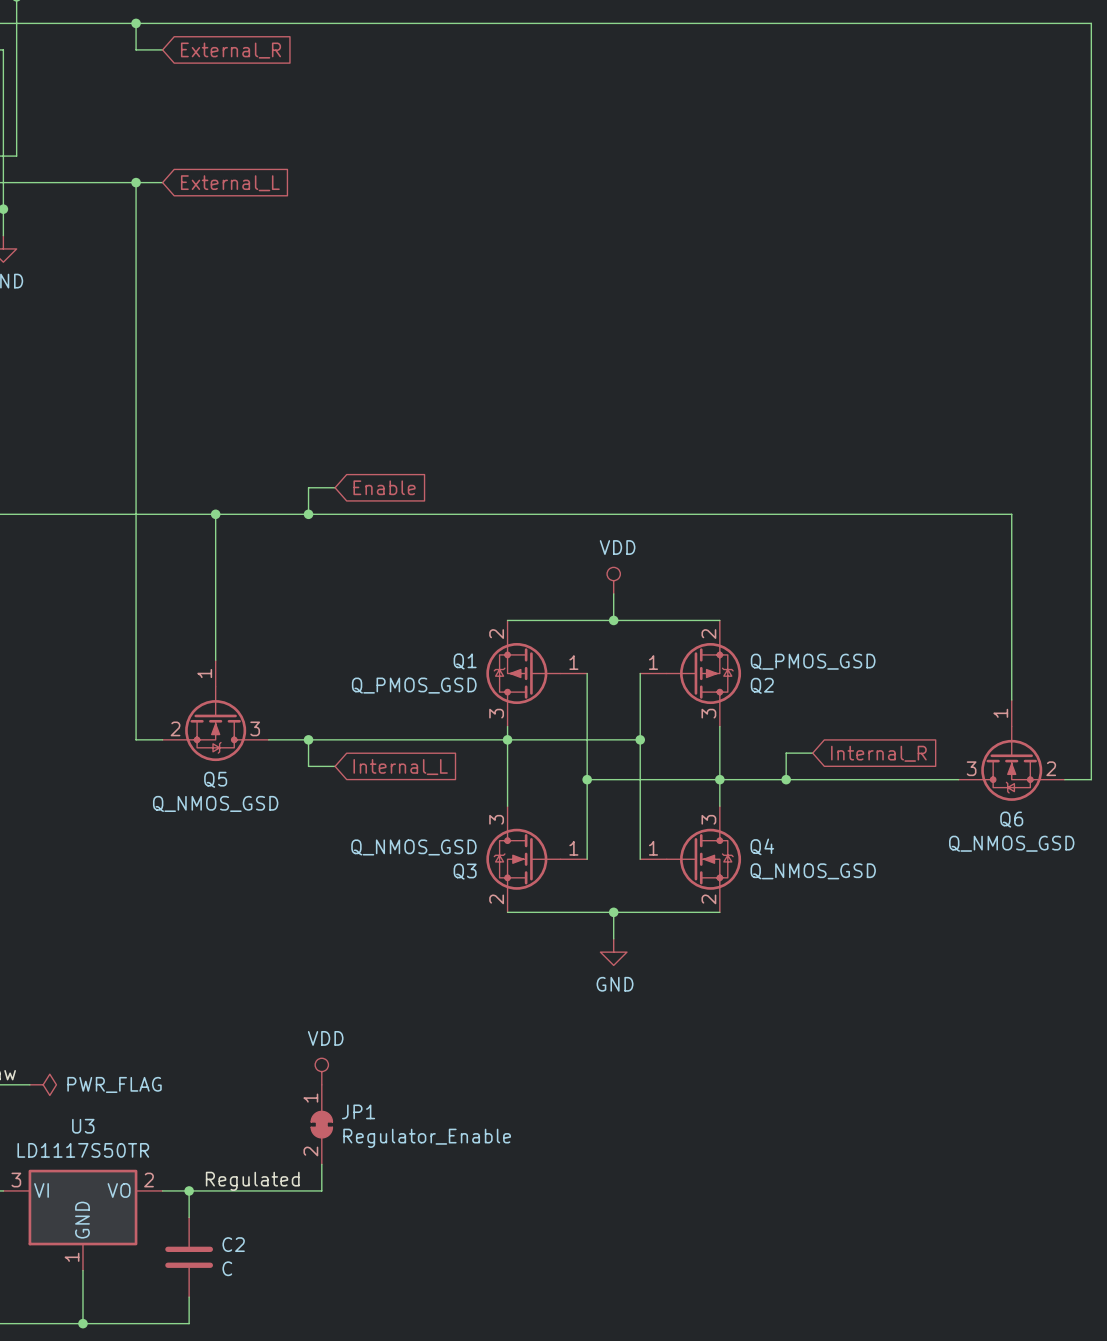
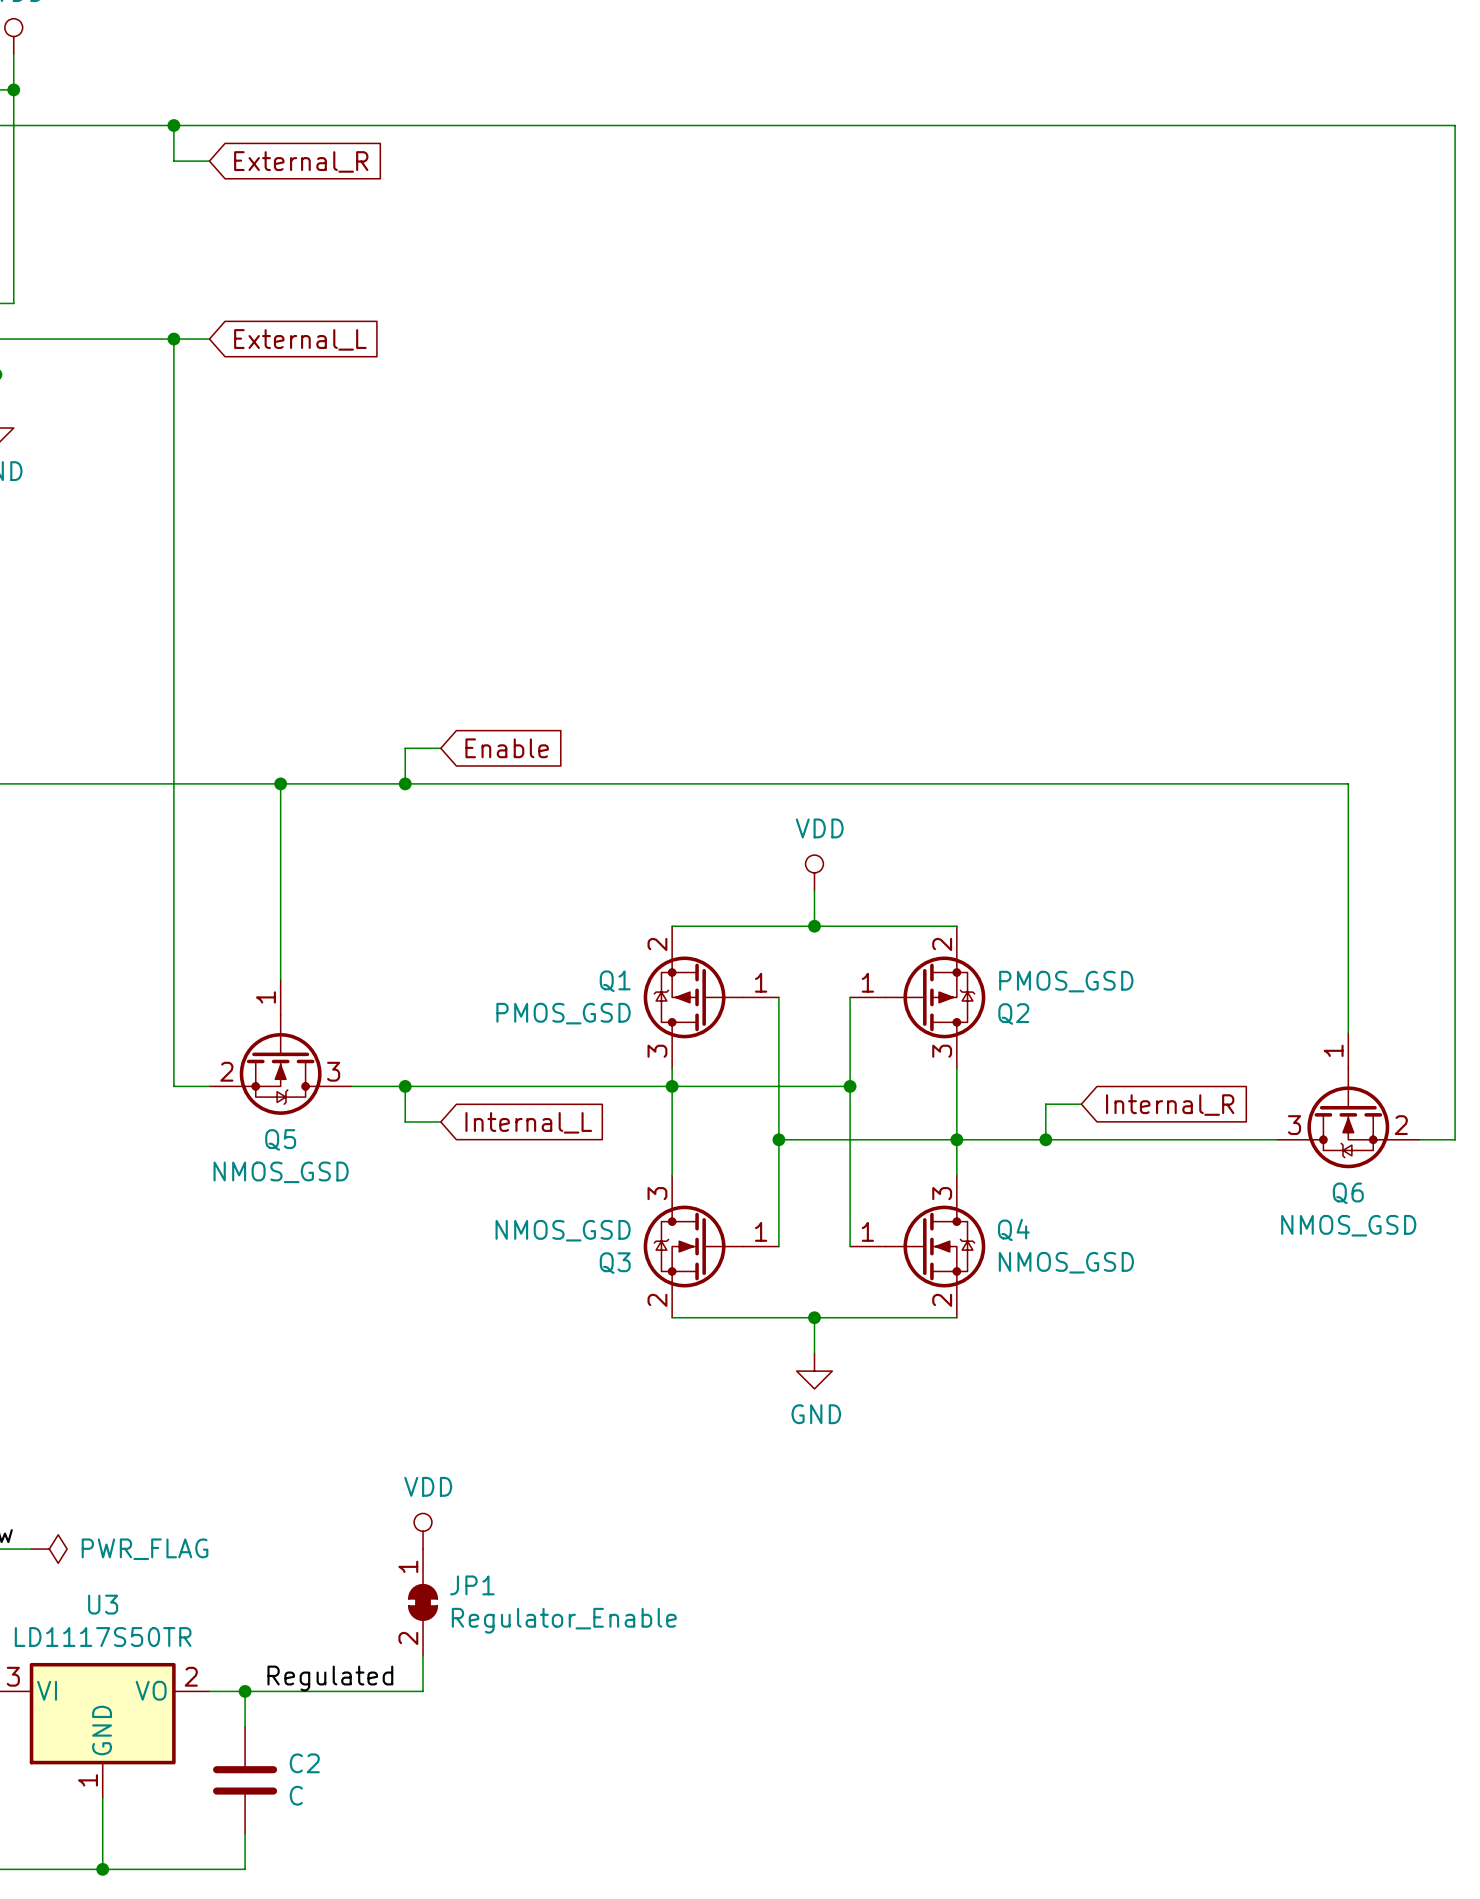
Q2 value: Q_PMOS_GSD (813, 661) -> PMOS_GSD (1066, 981)
Q1 value: Q_PMOS_GSD (414, 685) -> PMOS_GSD (563, 1013)
Q5 value: Q_NMOS_GSD (215, 803) -> NMOS_GSD (281, 1172)
Q6 value: Q_NMOS_GSD (1011, 843) -> NMOS_GSD (1348, 1225)
Q3 value: Q_NMOS_GSD (413, 847) -> NMOS_GSD (563, 1230)
Q4 value: Q_NMOS_GSD (813, 871) -> NMOS_GSD (1066, 1262)

